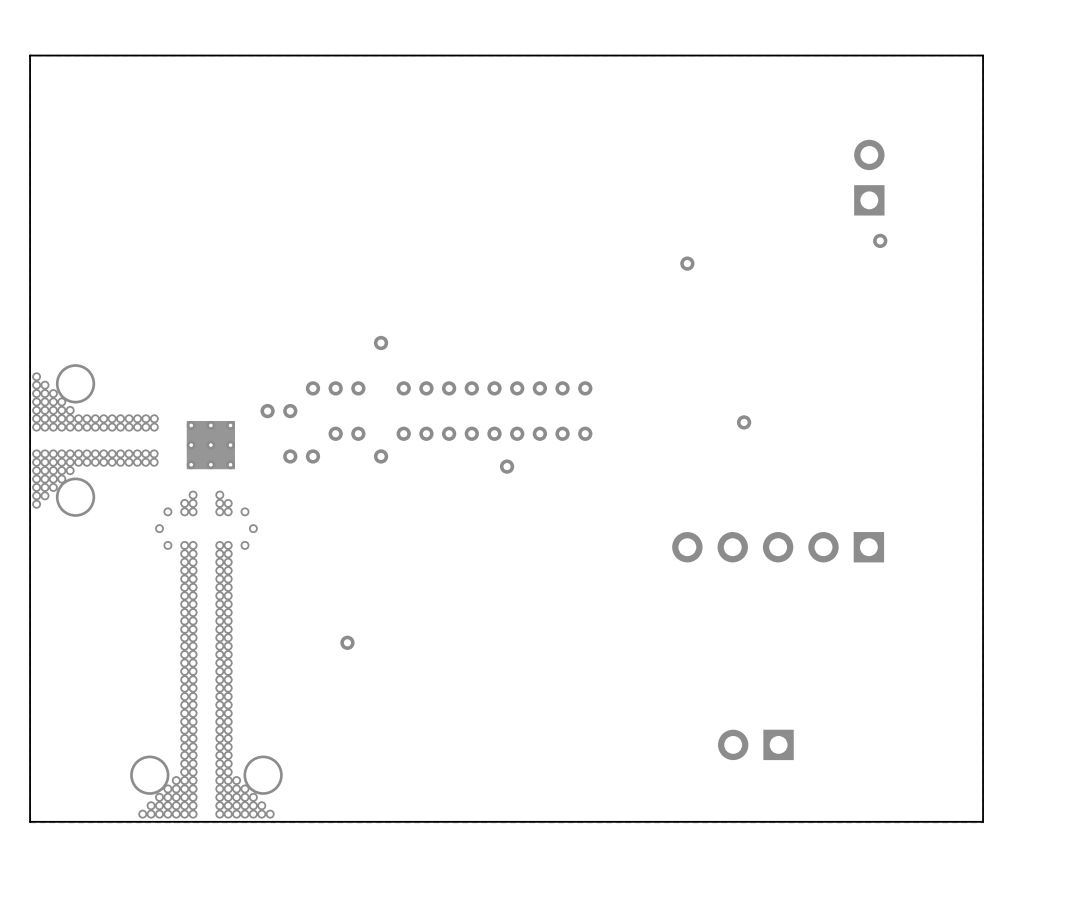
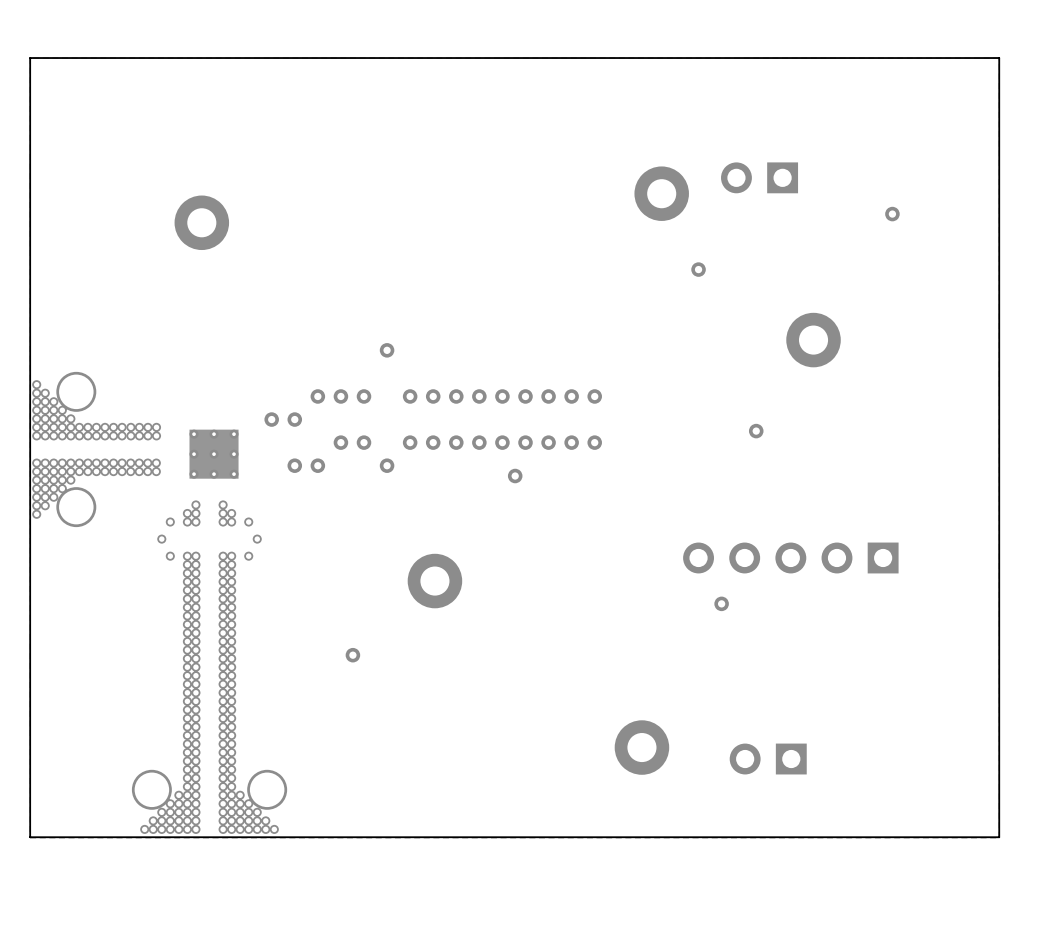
part rotation: 0° (869, 177) -> 90° counterclockwise (759, 177)
part position: (869, 177) -> (759, 177)
part: none -> (661, 193)
part: none -> (201, 222)
via position: (880, 240) -> (892, 214)
part: none -> (813, 340)
part: none -> (434, 581)
via: none -> (721, 603)
part: none -> (641, 747)

